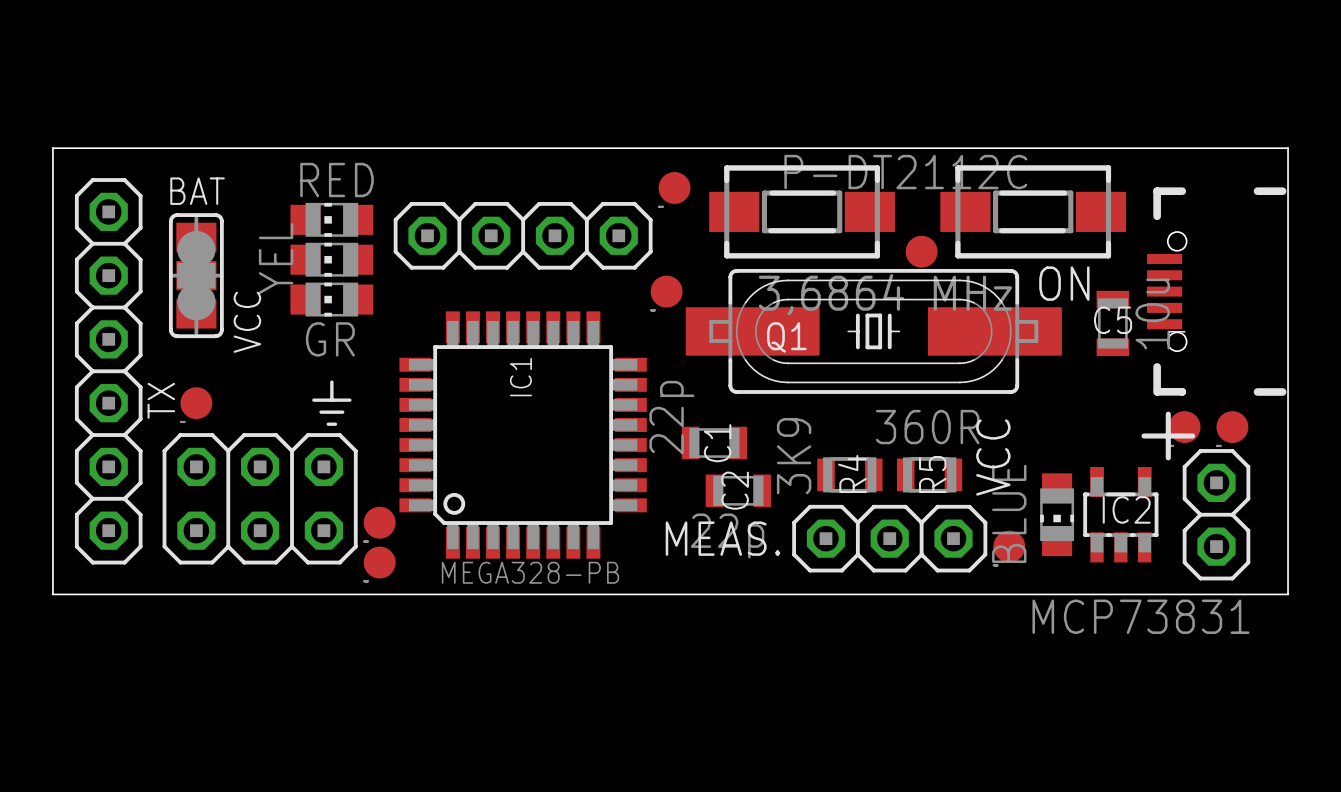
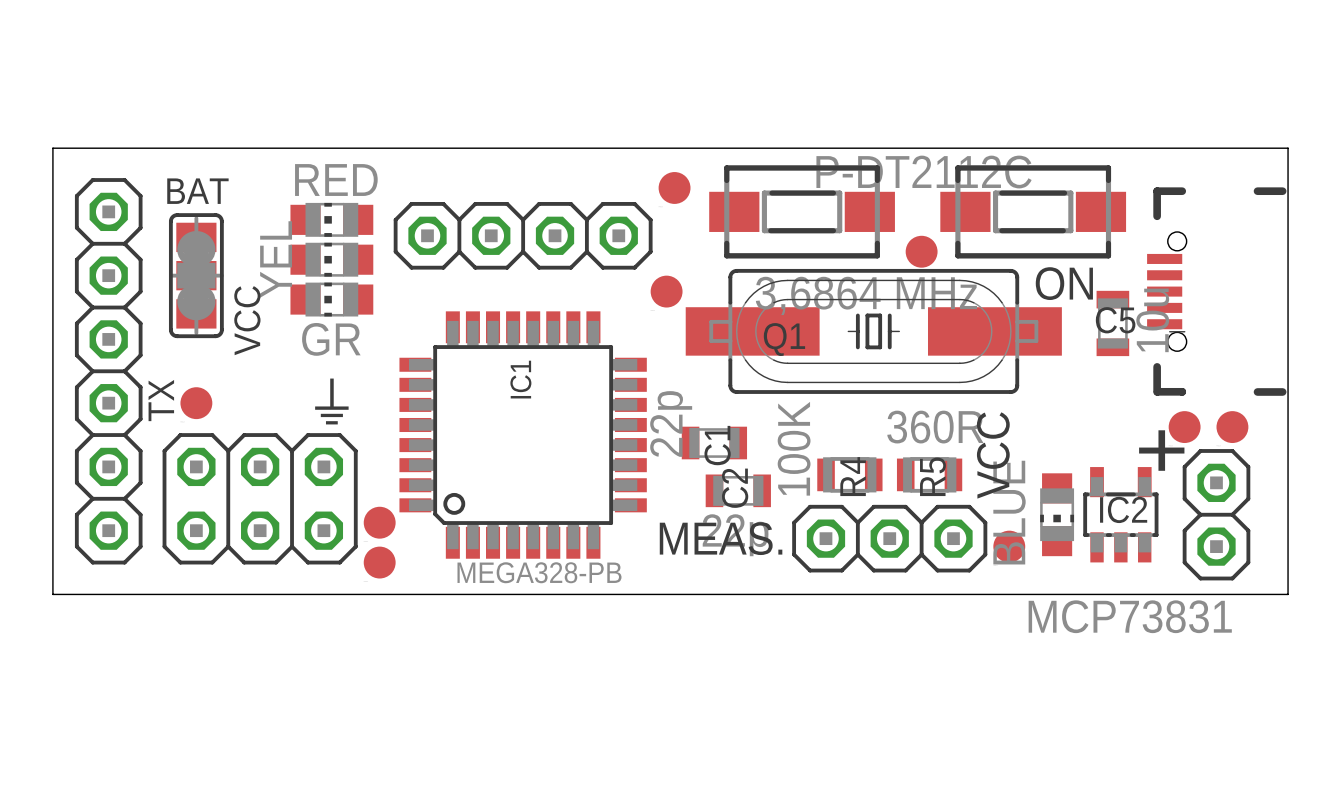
R4 value: 3K9 (794, 456) -> 100K (794, 448)

